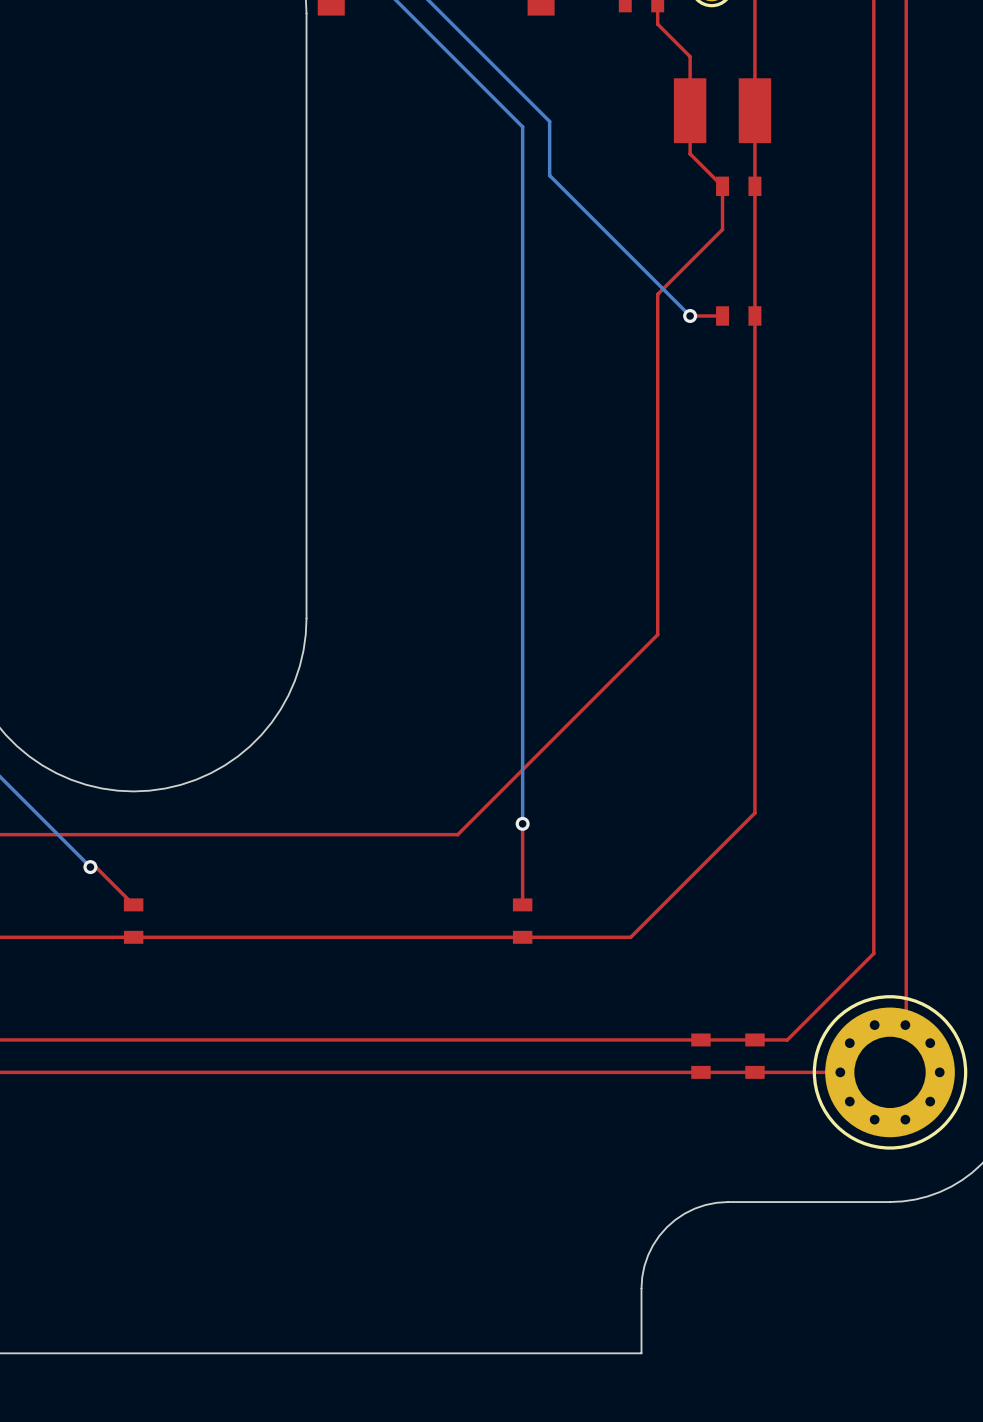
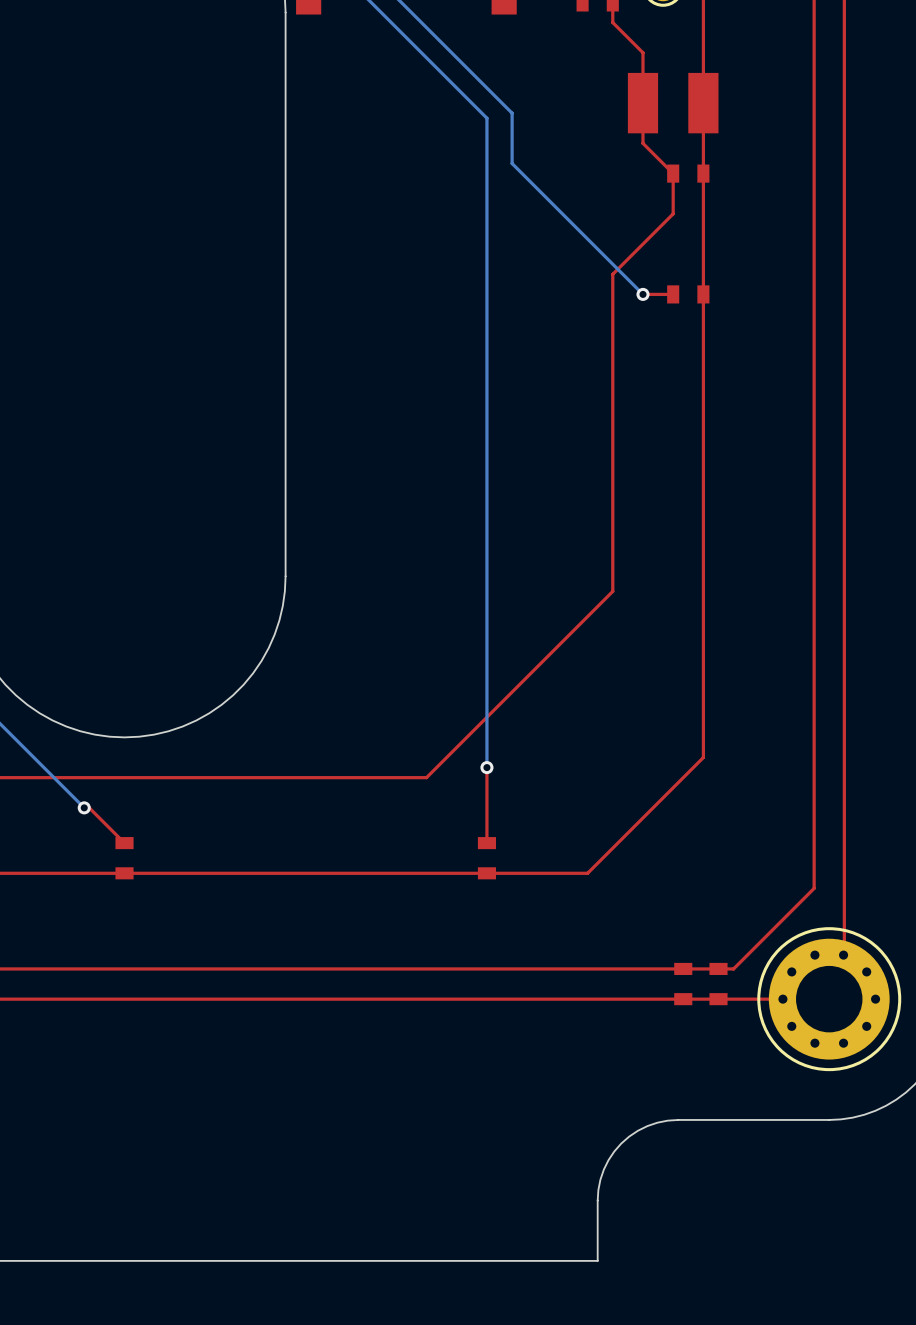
part: (700, 1056) -> none
part: none -> (683, 984)
part: (754, 1056) -> none
part: none -> (718, 984)

